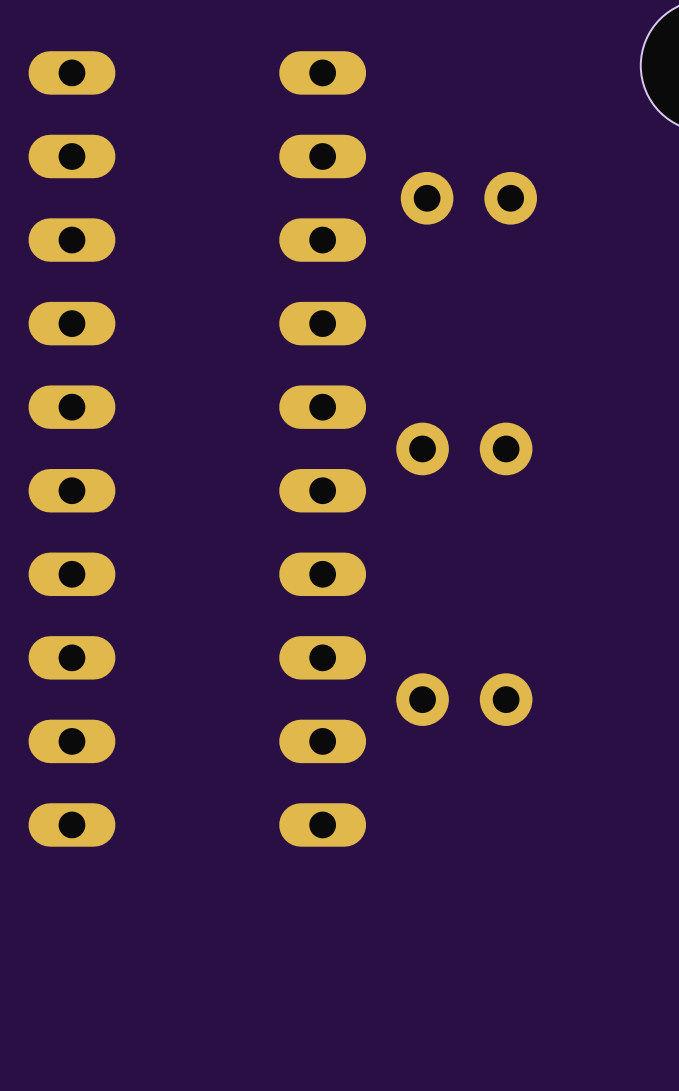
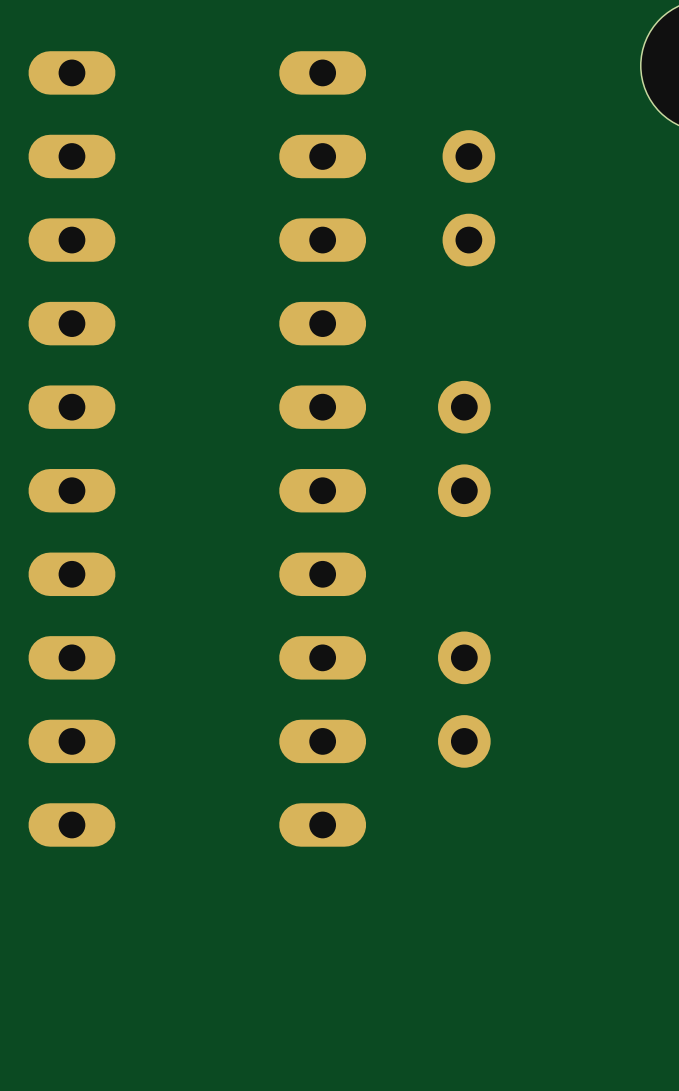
part rotation: 0° (468, 198) -> 90° clockwise (468, 198)
part rotation: 0° (464, 448) -> 90° clockwise (464, 448)
part rotation: 0° (464, 699) -> 90° clockwise (464, 699)

